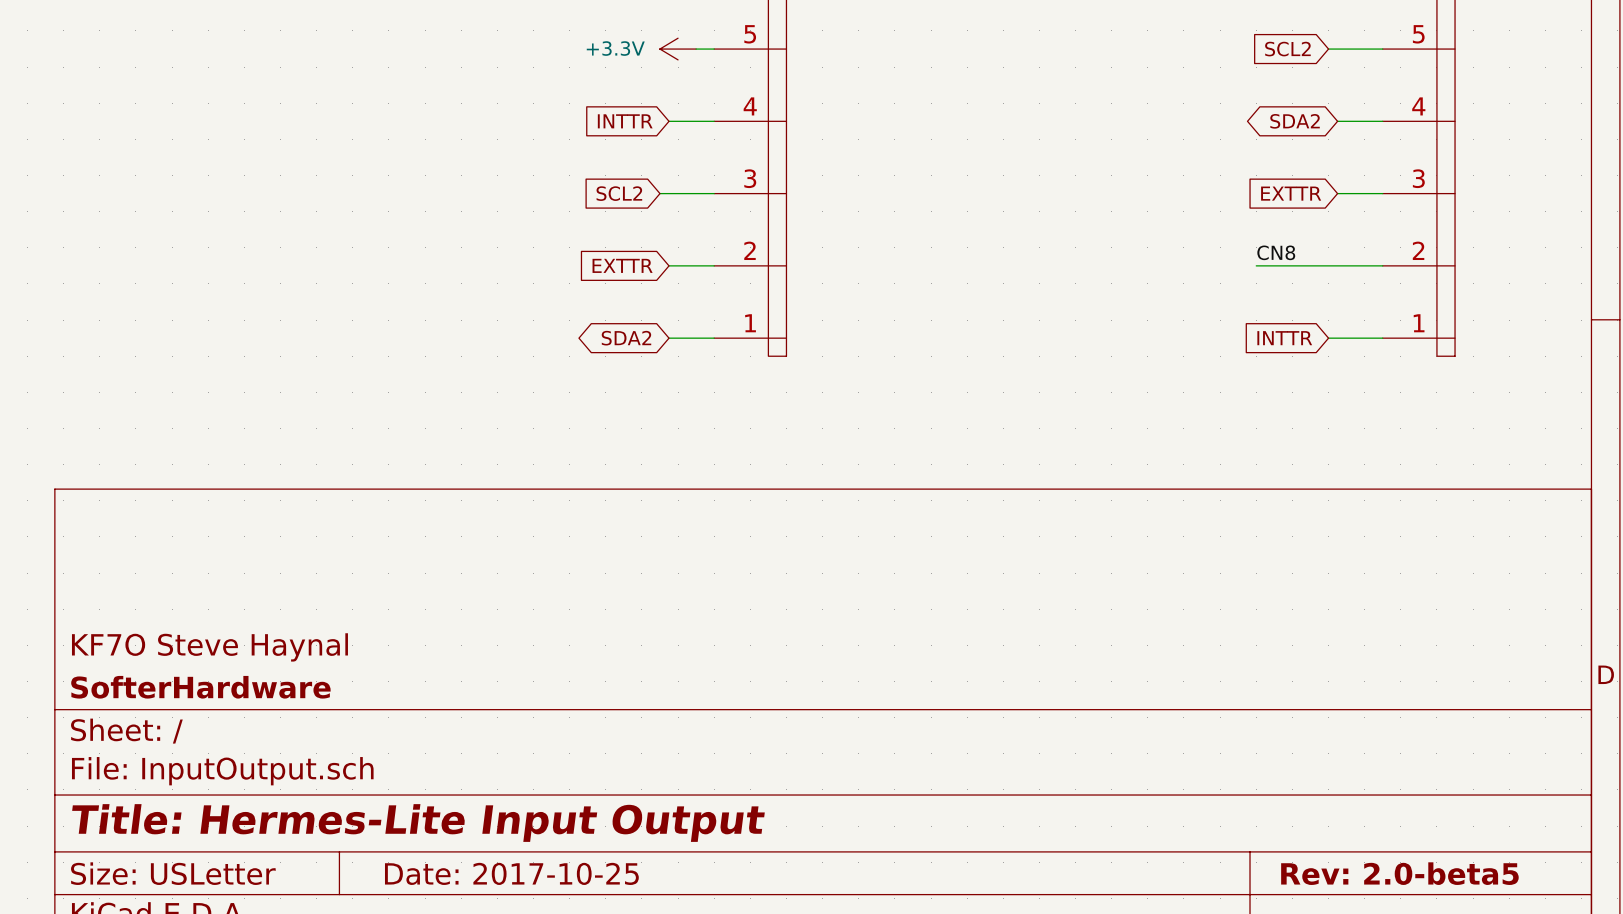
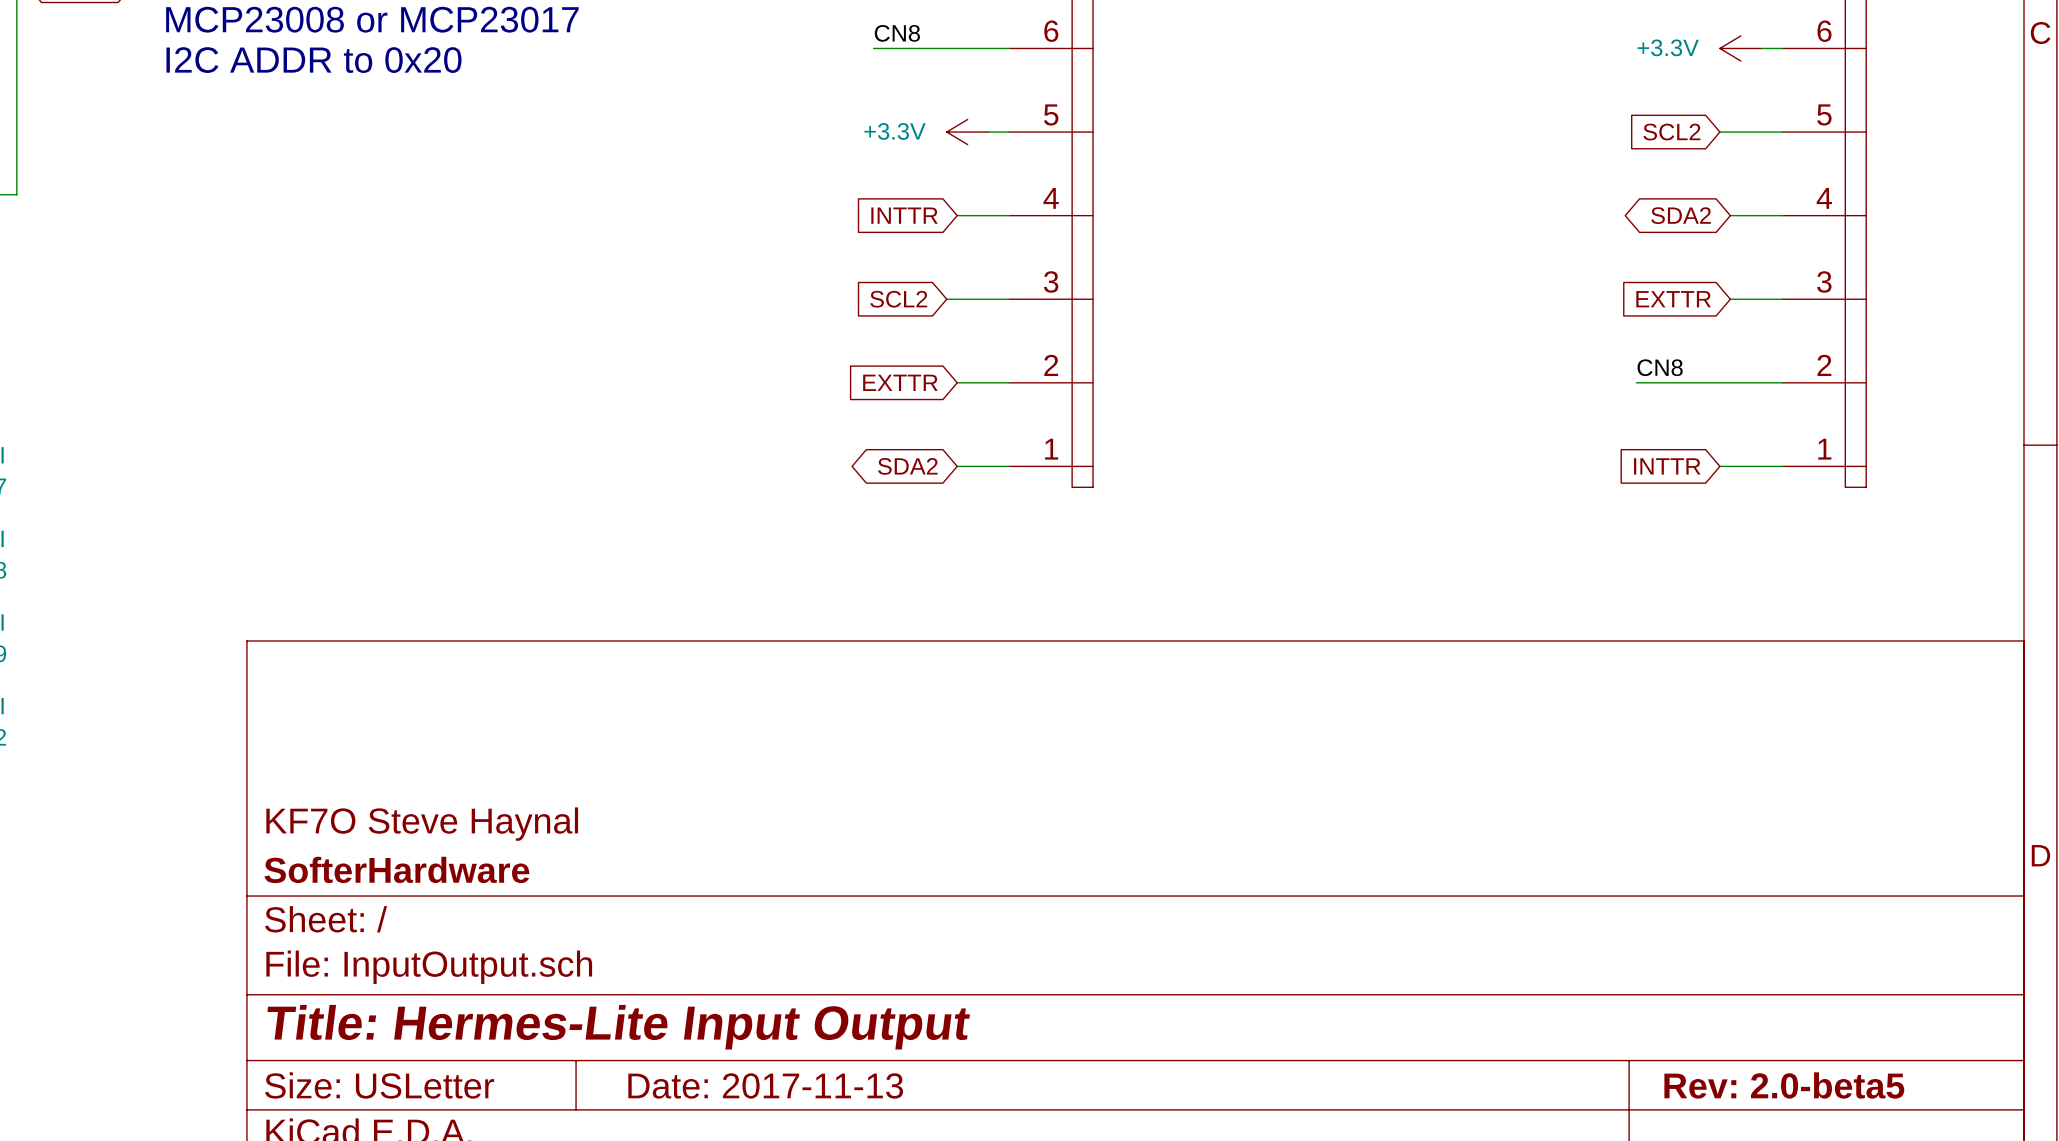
title block: Date: 2017-10-25 (511, 873) -> Date: 2017-11-13 (765, 1085)

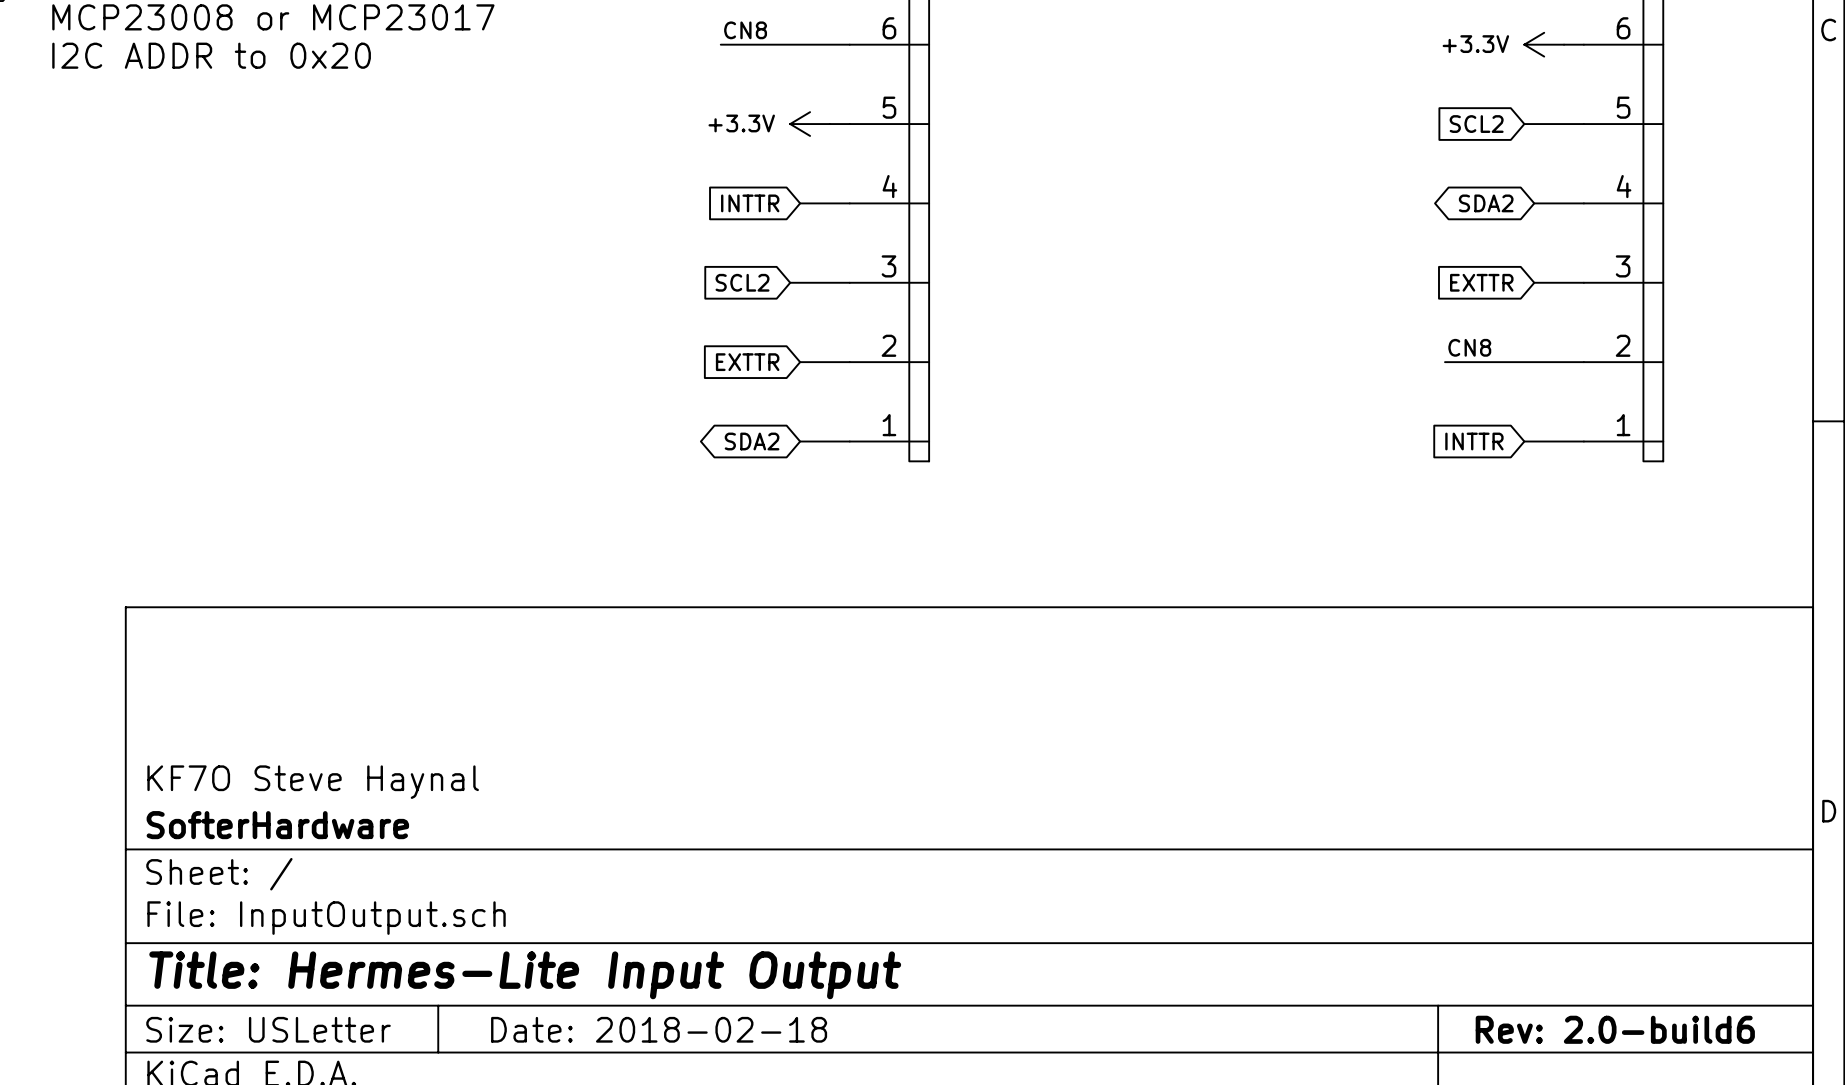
title block: Date: 2017-11-13 (765, 1085) -> Date: 2018-02-18 (659, 1029)
title block: Rev: 2.0-beta5 (1784, 1085) -> Rev: 2.0-build6 (1615, 1029)

